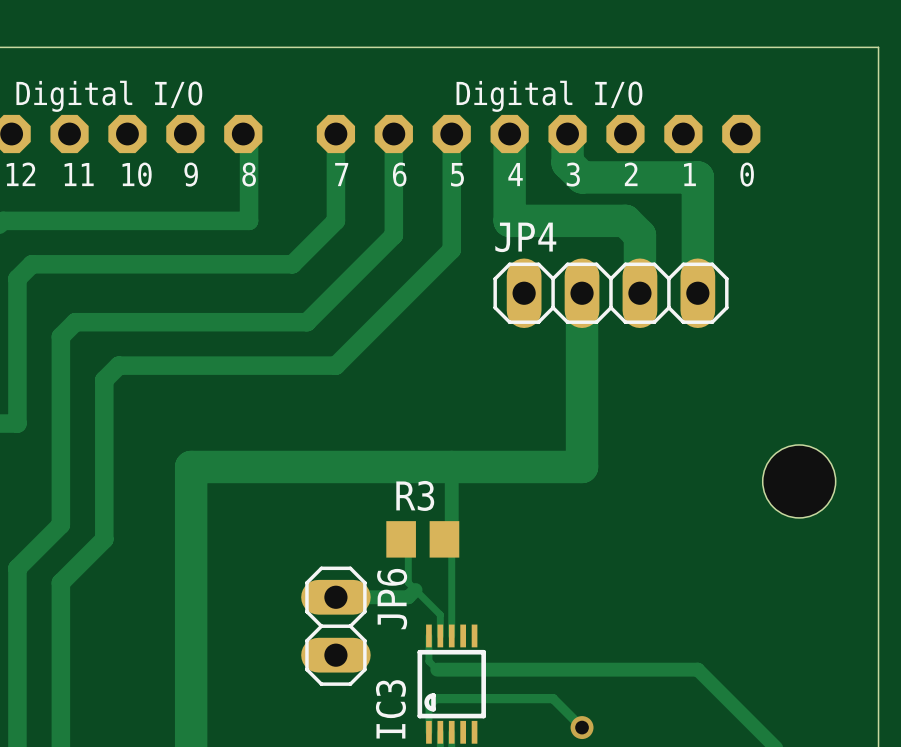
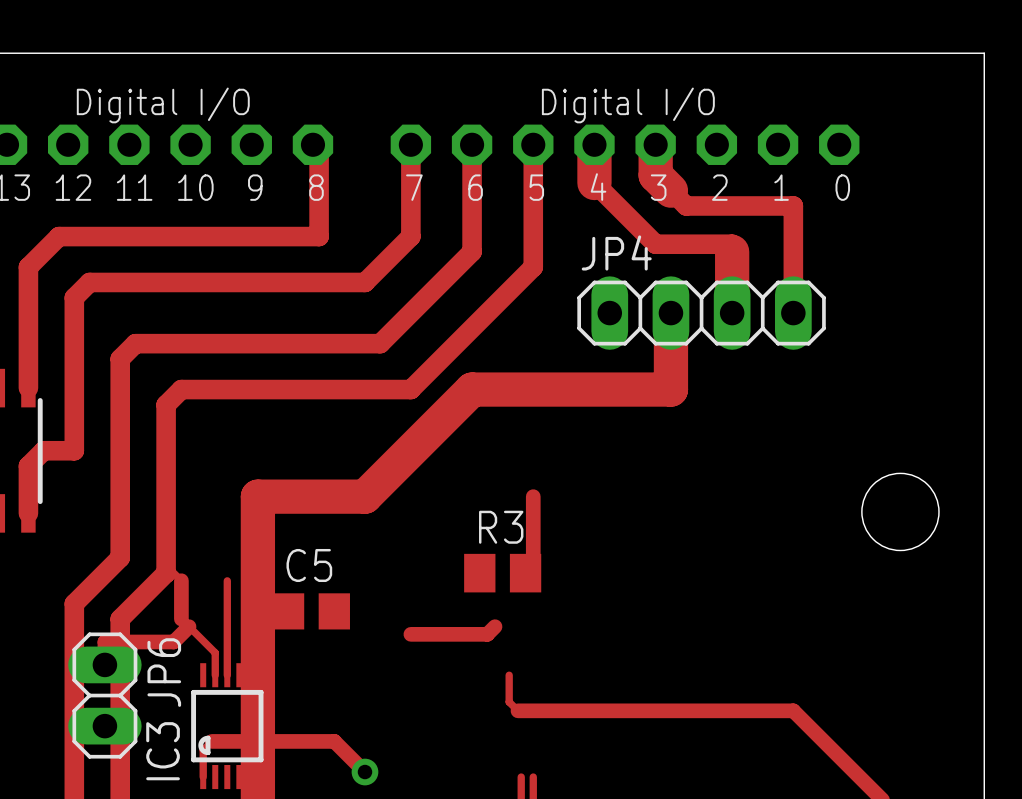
track: (509, 170) (509, 220) (625, 220) (639, 235) -> (594, 183) (655, 244) (732, 244) (732, 251)
track: (582, 177) (697, 177) (697, 191) -> (670, 190) (686, 205) (793, 205)
track width: thick (697, 191) (697, 293) -> thin (793, 205) (793, 313)
track: (582, 365) (582, 466) (292, 466) -> (670, 389) (472, 389) (364, 496)
track: (401, 539) (408, 546) (408, 582) (440, 614) (440, 635) -> (173, 573) (181, 580) (181, 619) (215, 652) (215, 675)
track: (444, 539) (451, 546) (451, 635) -> none
track: none -> (227, 580) (227, 675)
C5: none -> (311, 611)
track: none -> (189, 626) (173, 641) (104, 641) (104, 664)
JP6 position: (335, 626) -> (104, 695)
IC3 position: (451, 684) -> (227, 726)
via: none -> (364, 772)
track: (582, 727) (553, 698) (437, 698) (428, 706) (428, 732) -> (364, 772) (334, 741) (212, 741) (203, 750) (203, 777)
via: (582, 727) -> none

